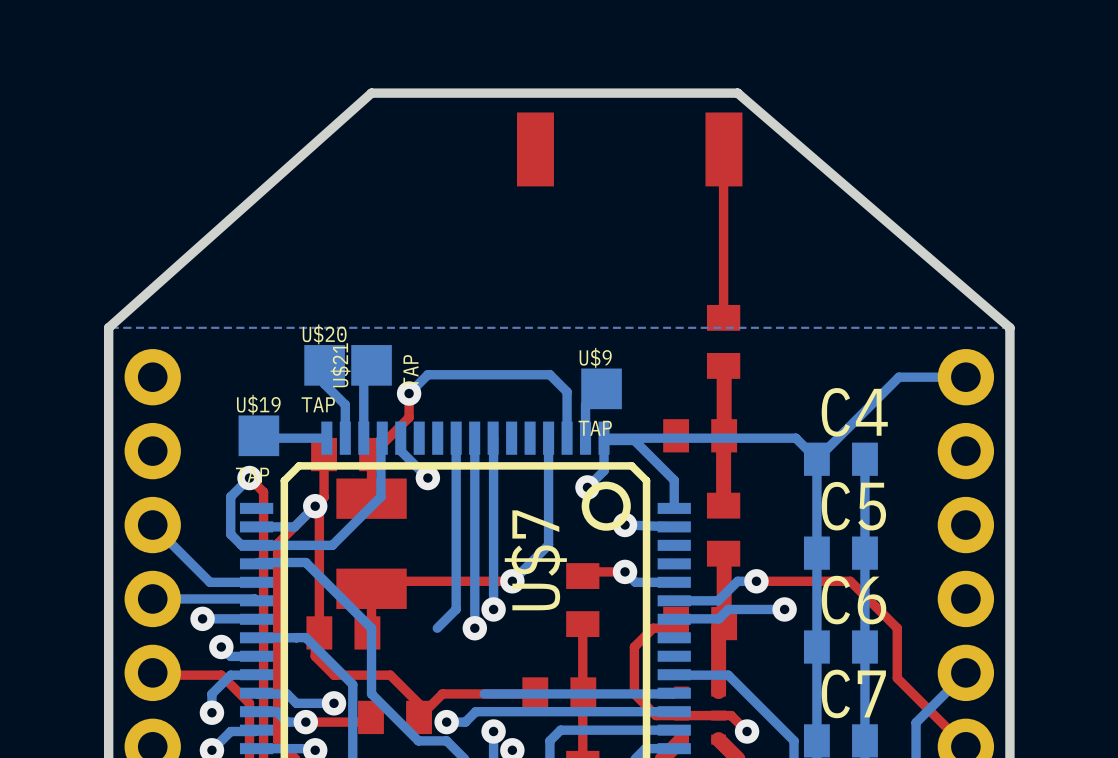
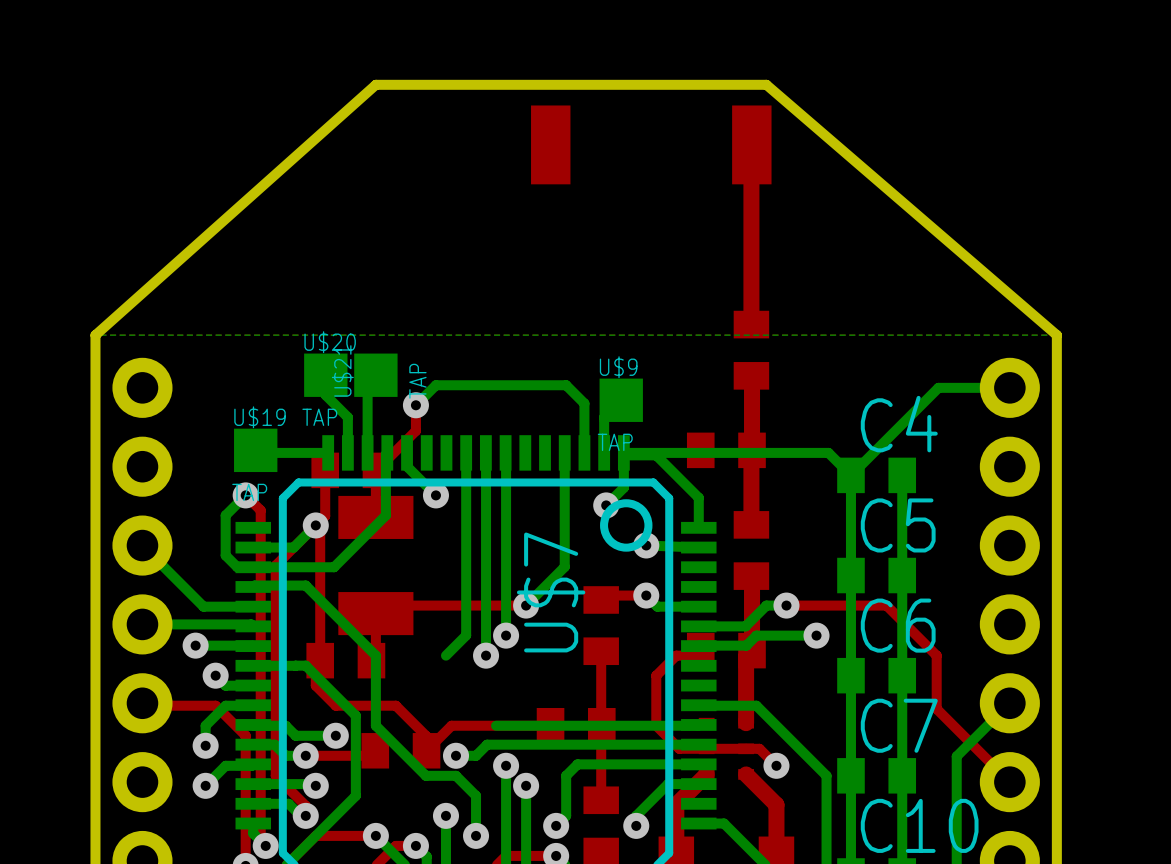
top track width: thin (723, 149) (723, 317) -> thick (751, 145) (751, 324)

